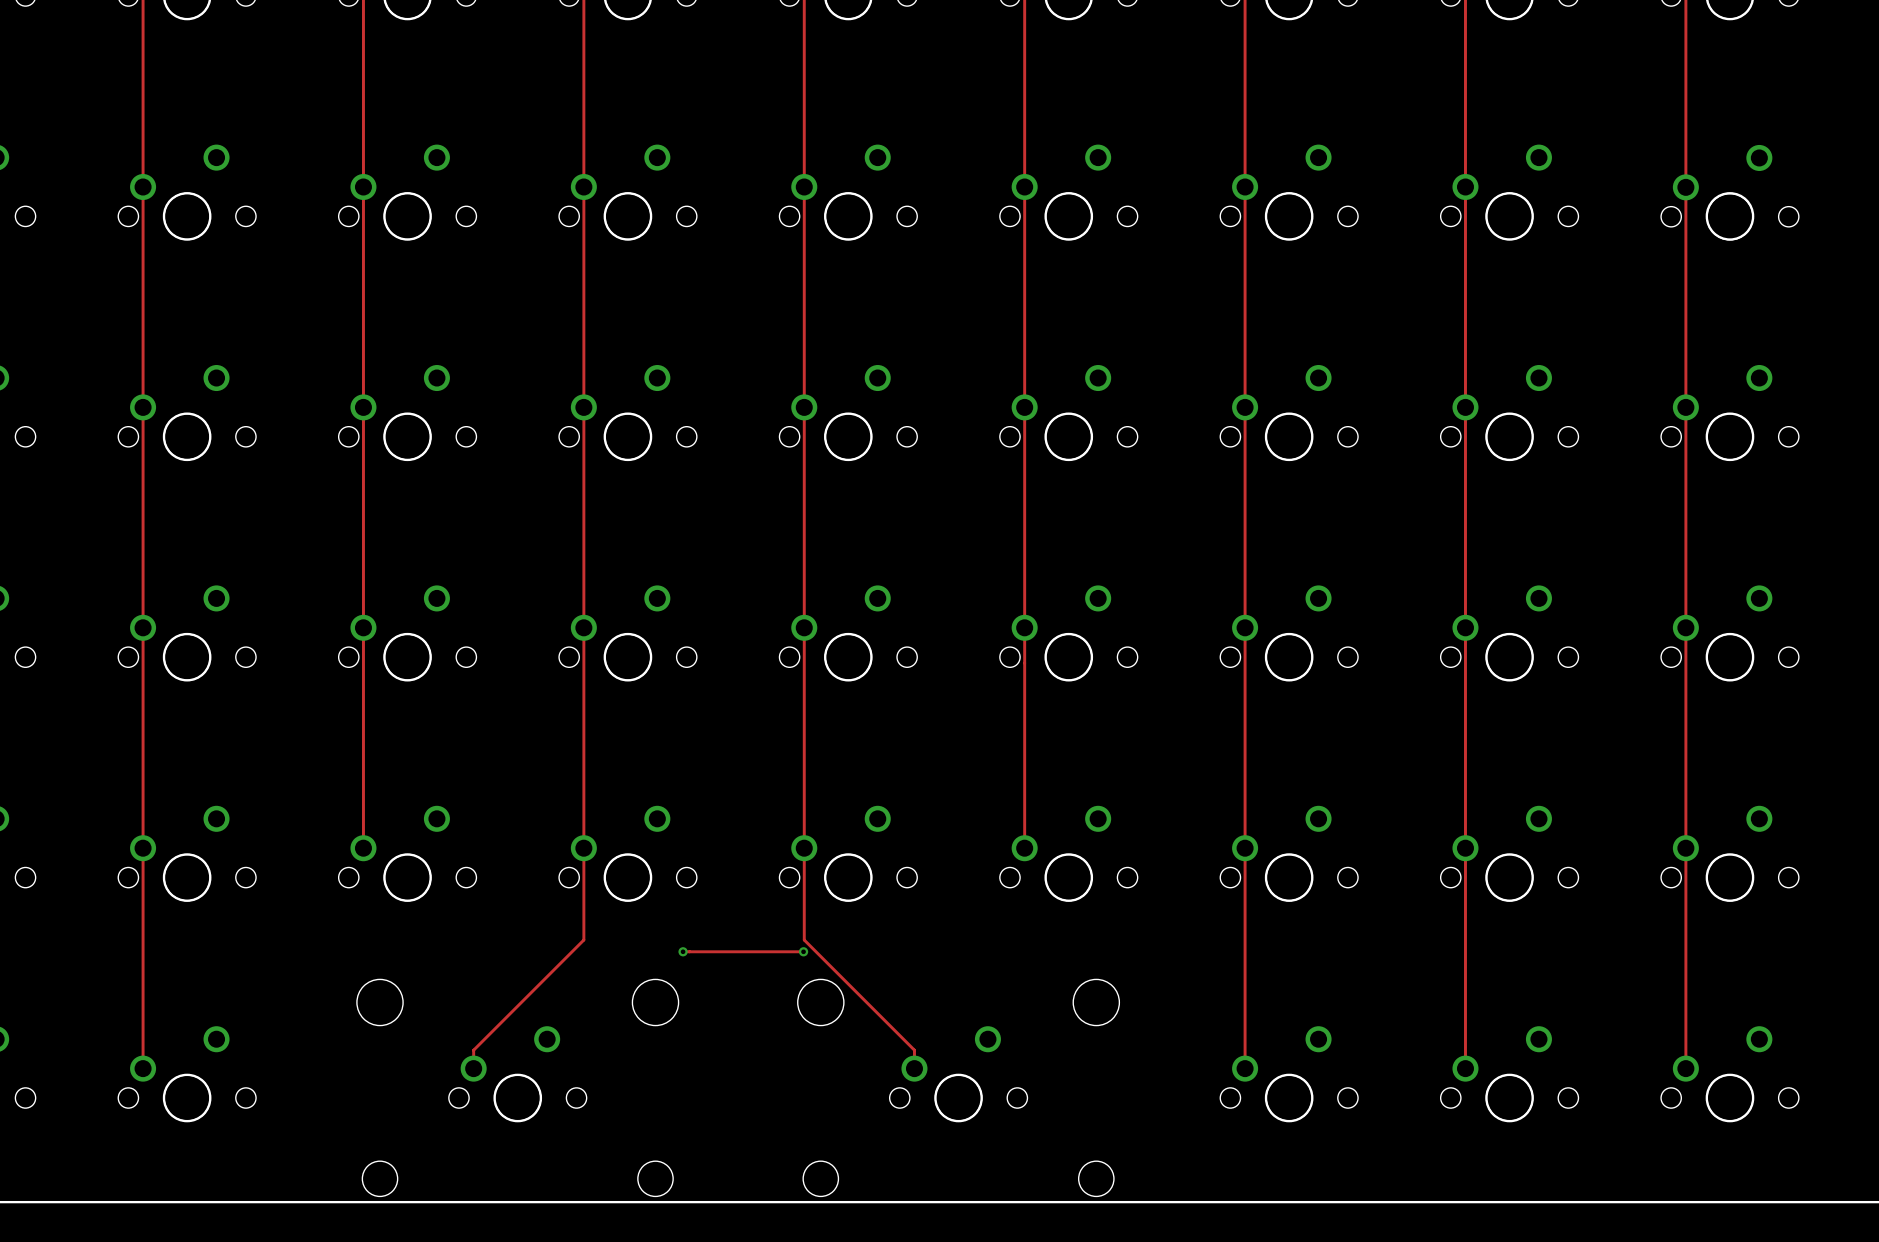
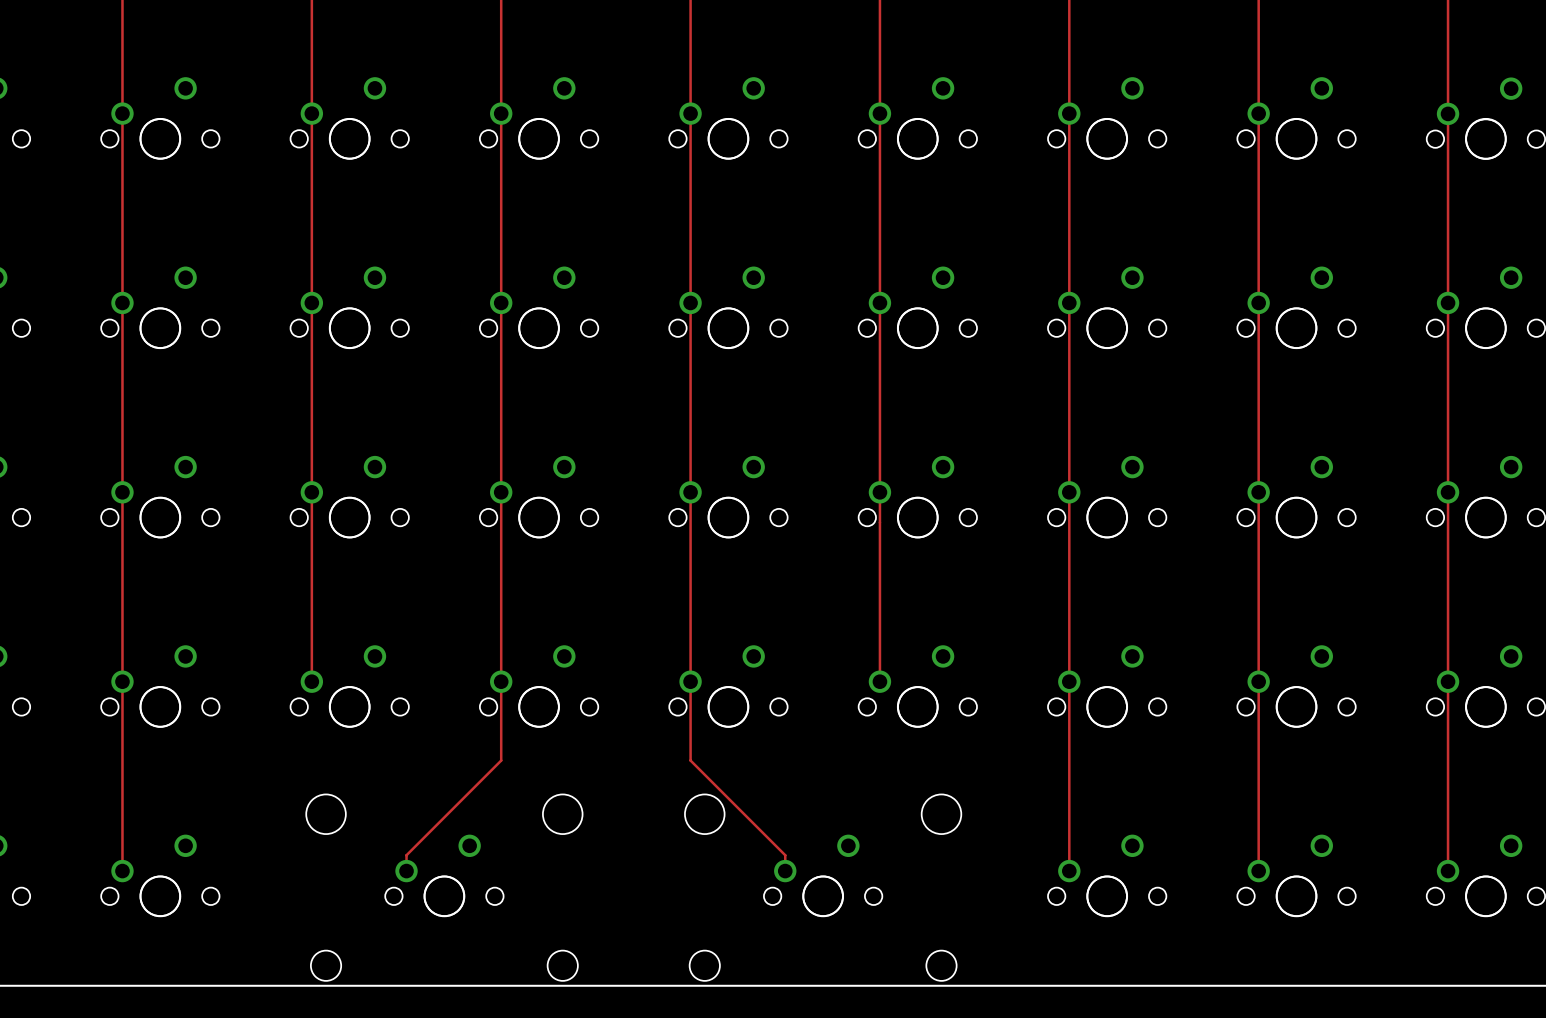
track: (683, 951) (803, 951) -> none
via: (683, 951) -> none
via: (803, 951) -> none

